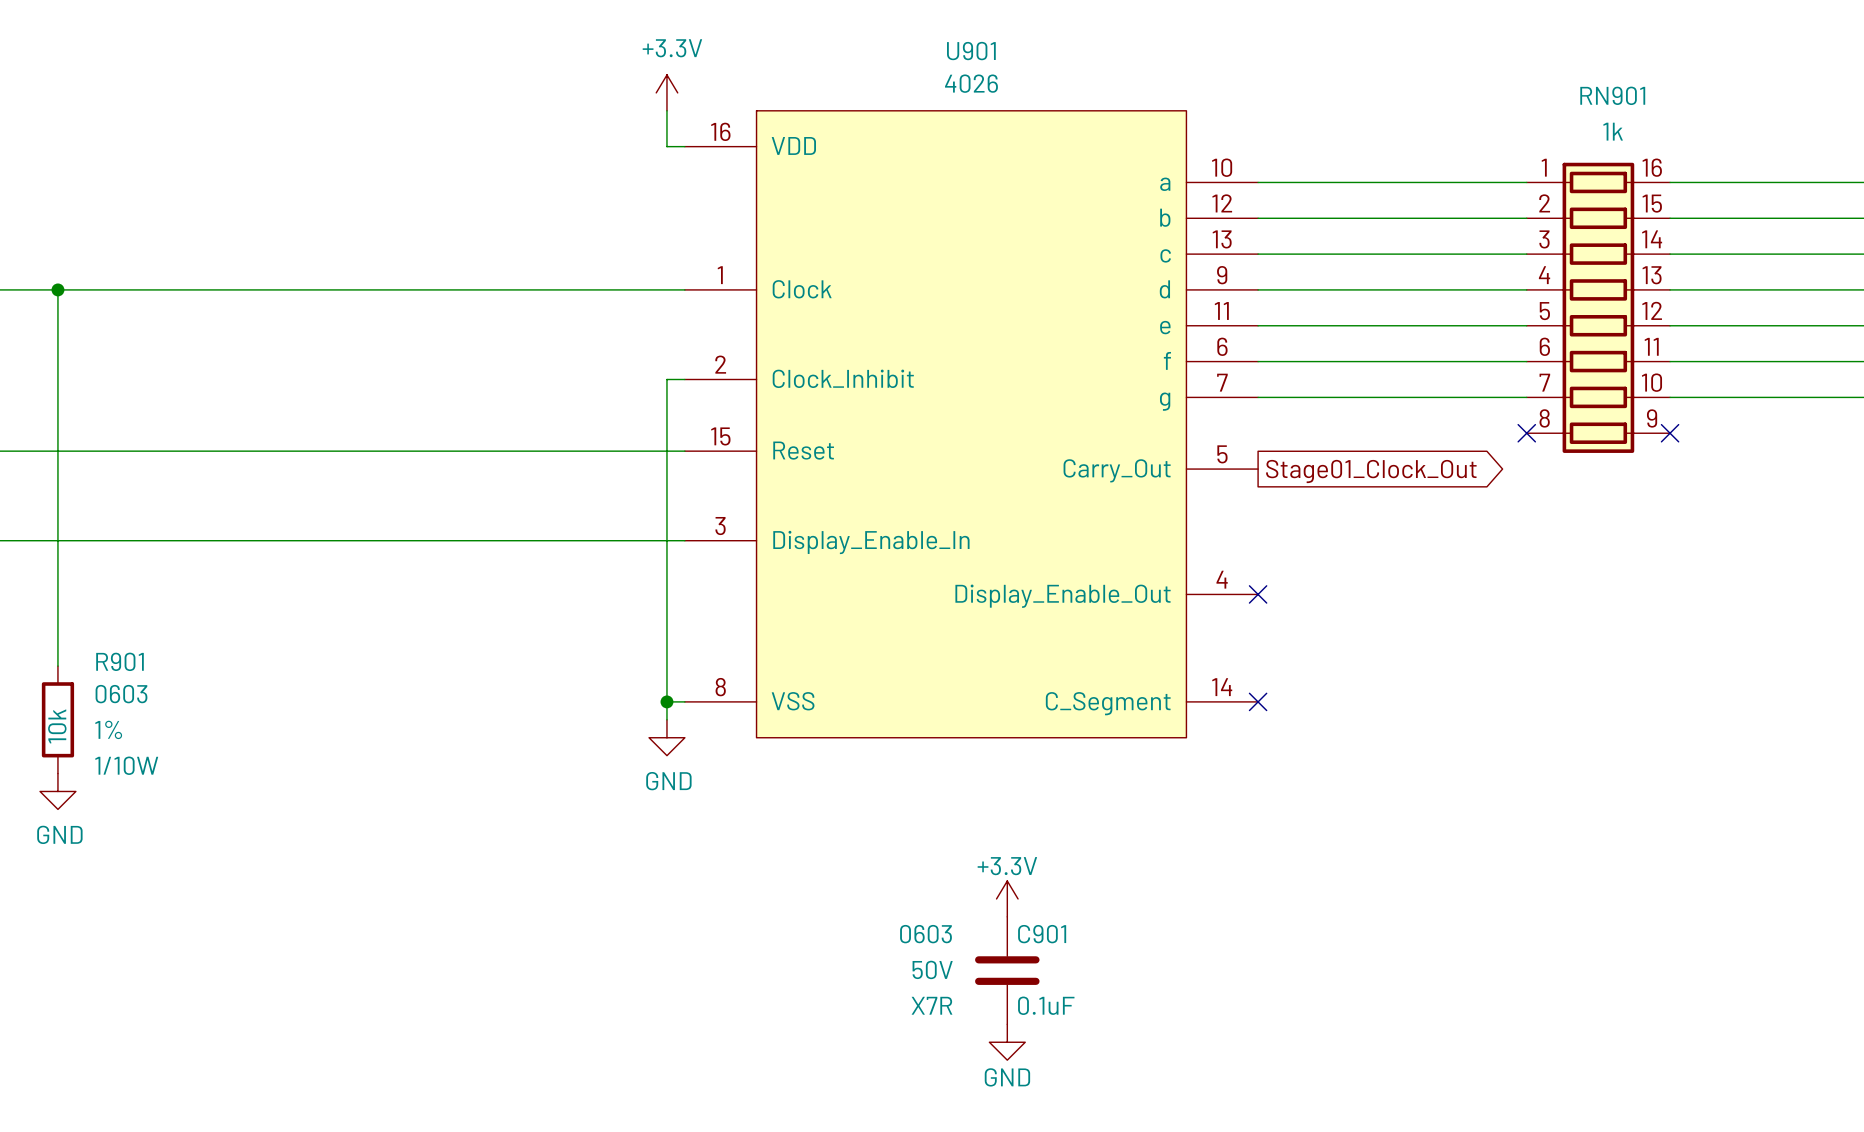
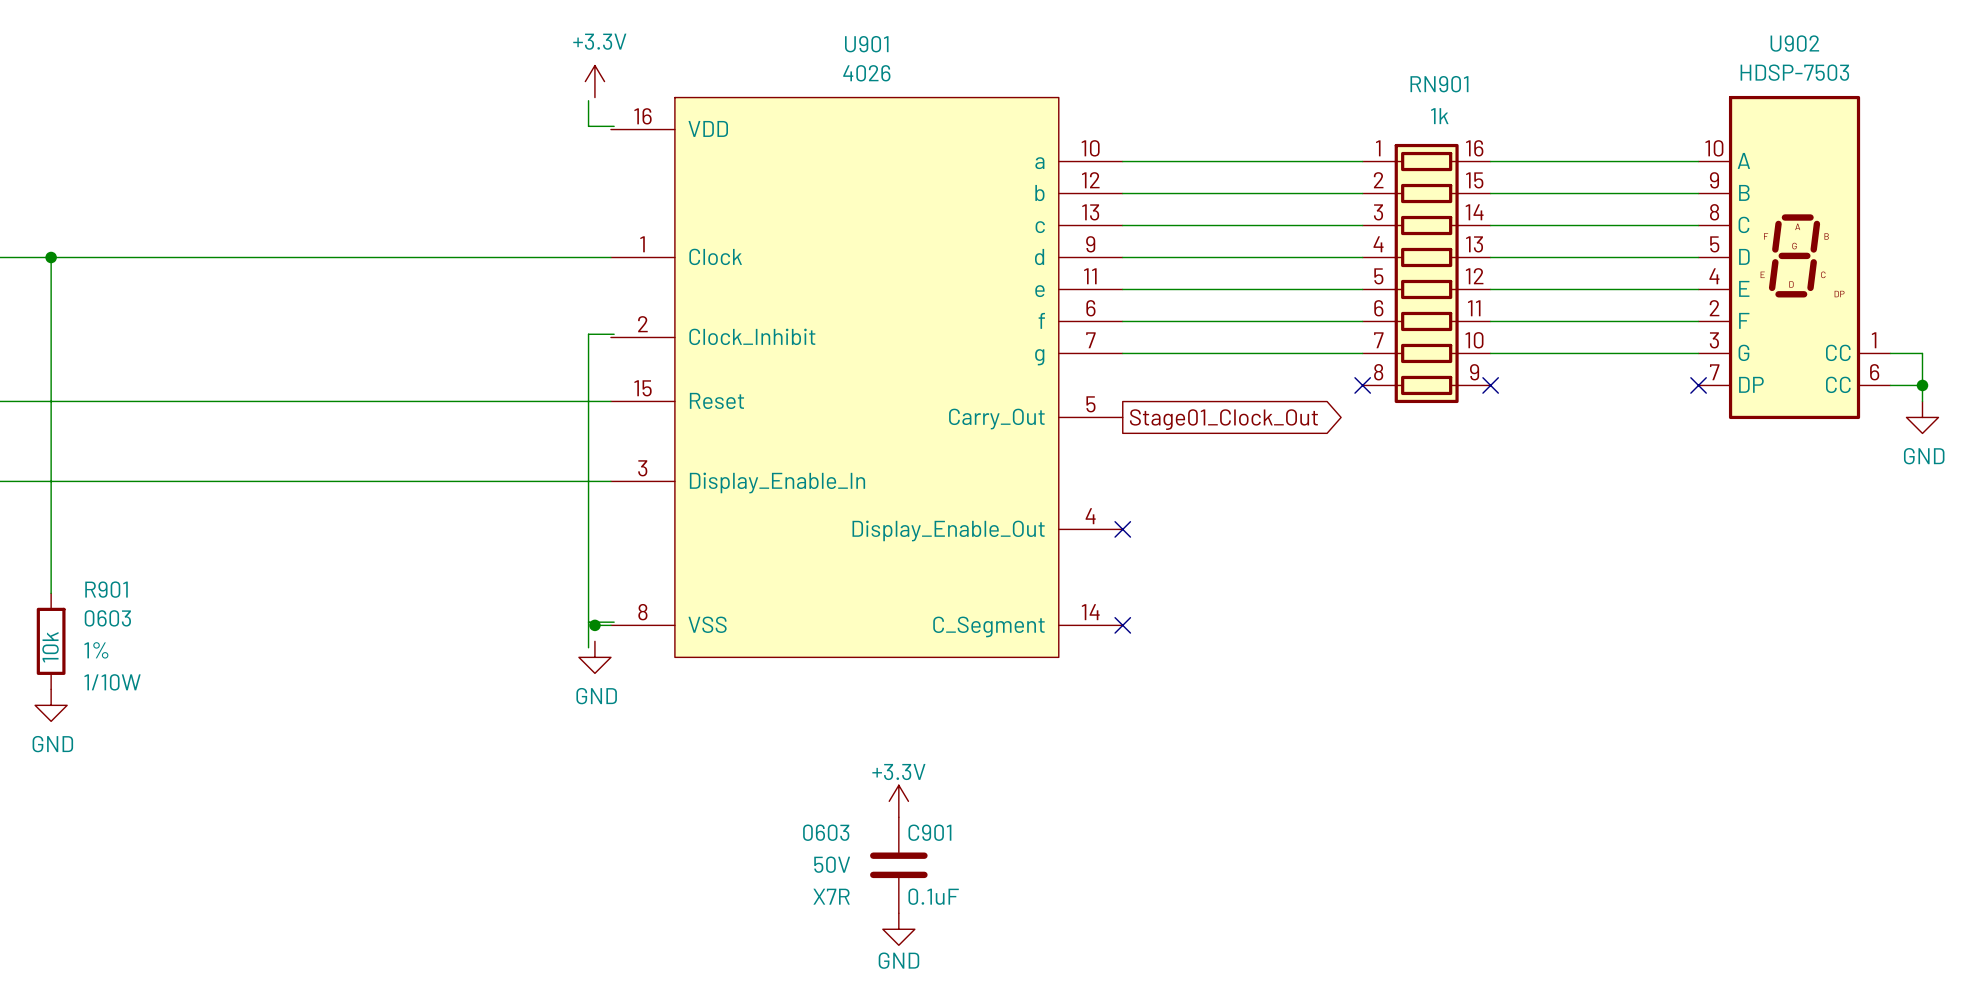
wire: (666, 110) (666, 146) (684, 146) -> none
wire: none -> (588, 100) (588, 126) (614, 126)
wire: none -> (614, 334) (588, 334) (588, 647)
wire: (684, 379) (666, 379) (666, 719) -> none
wire: none -> (588, 622) (614, 622)

